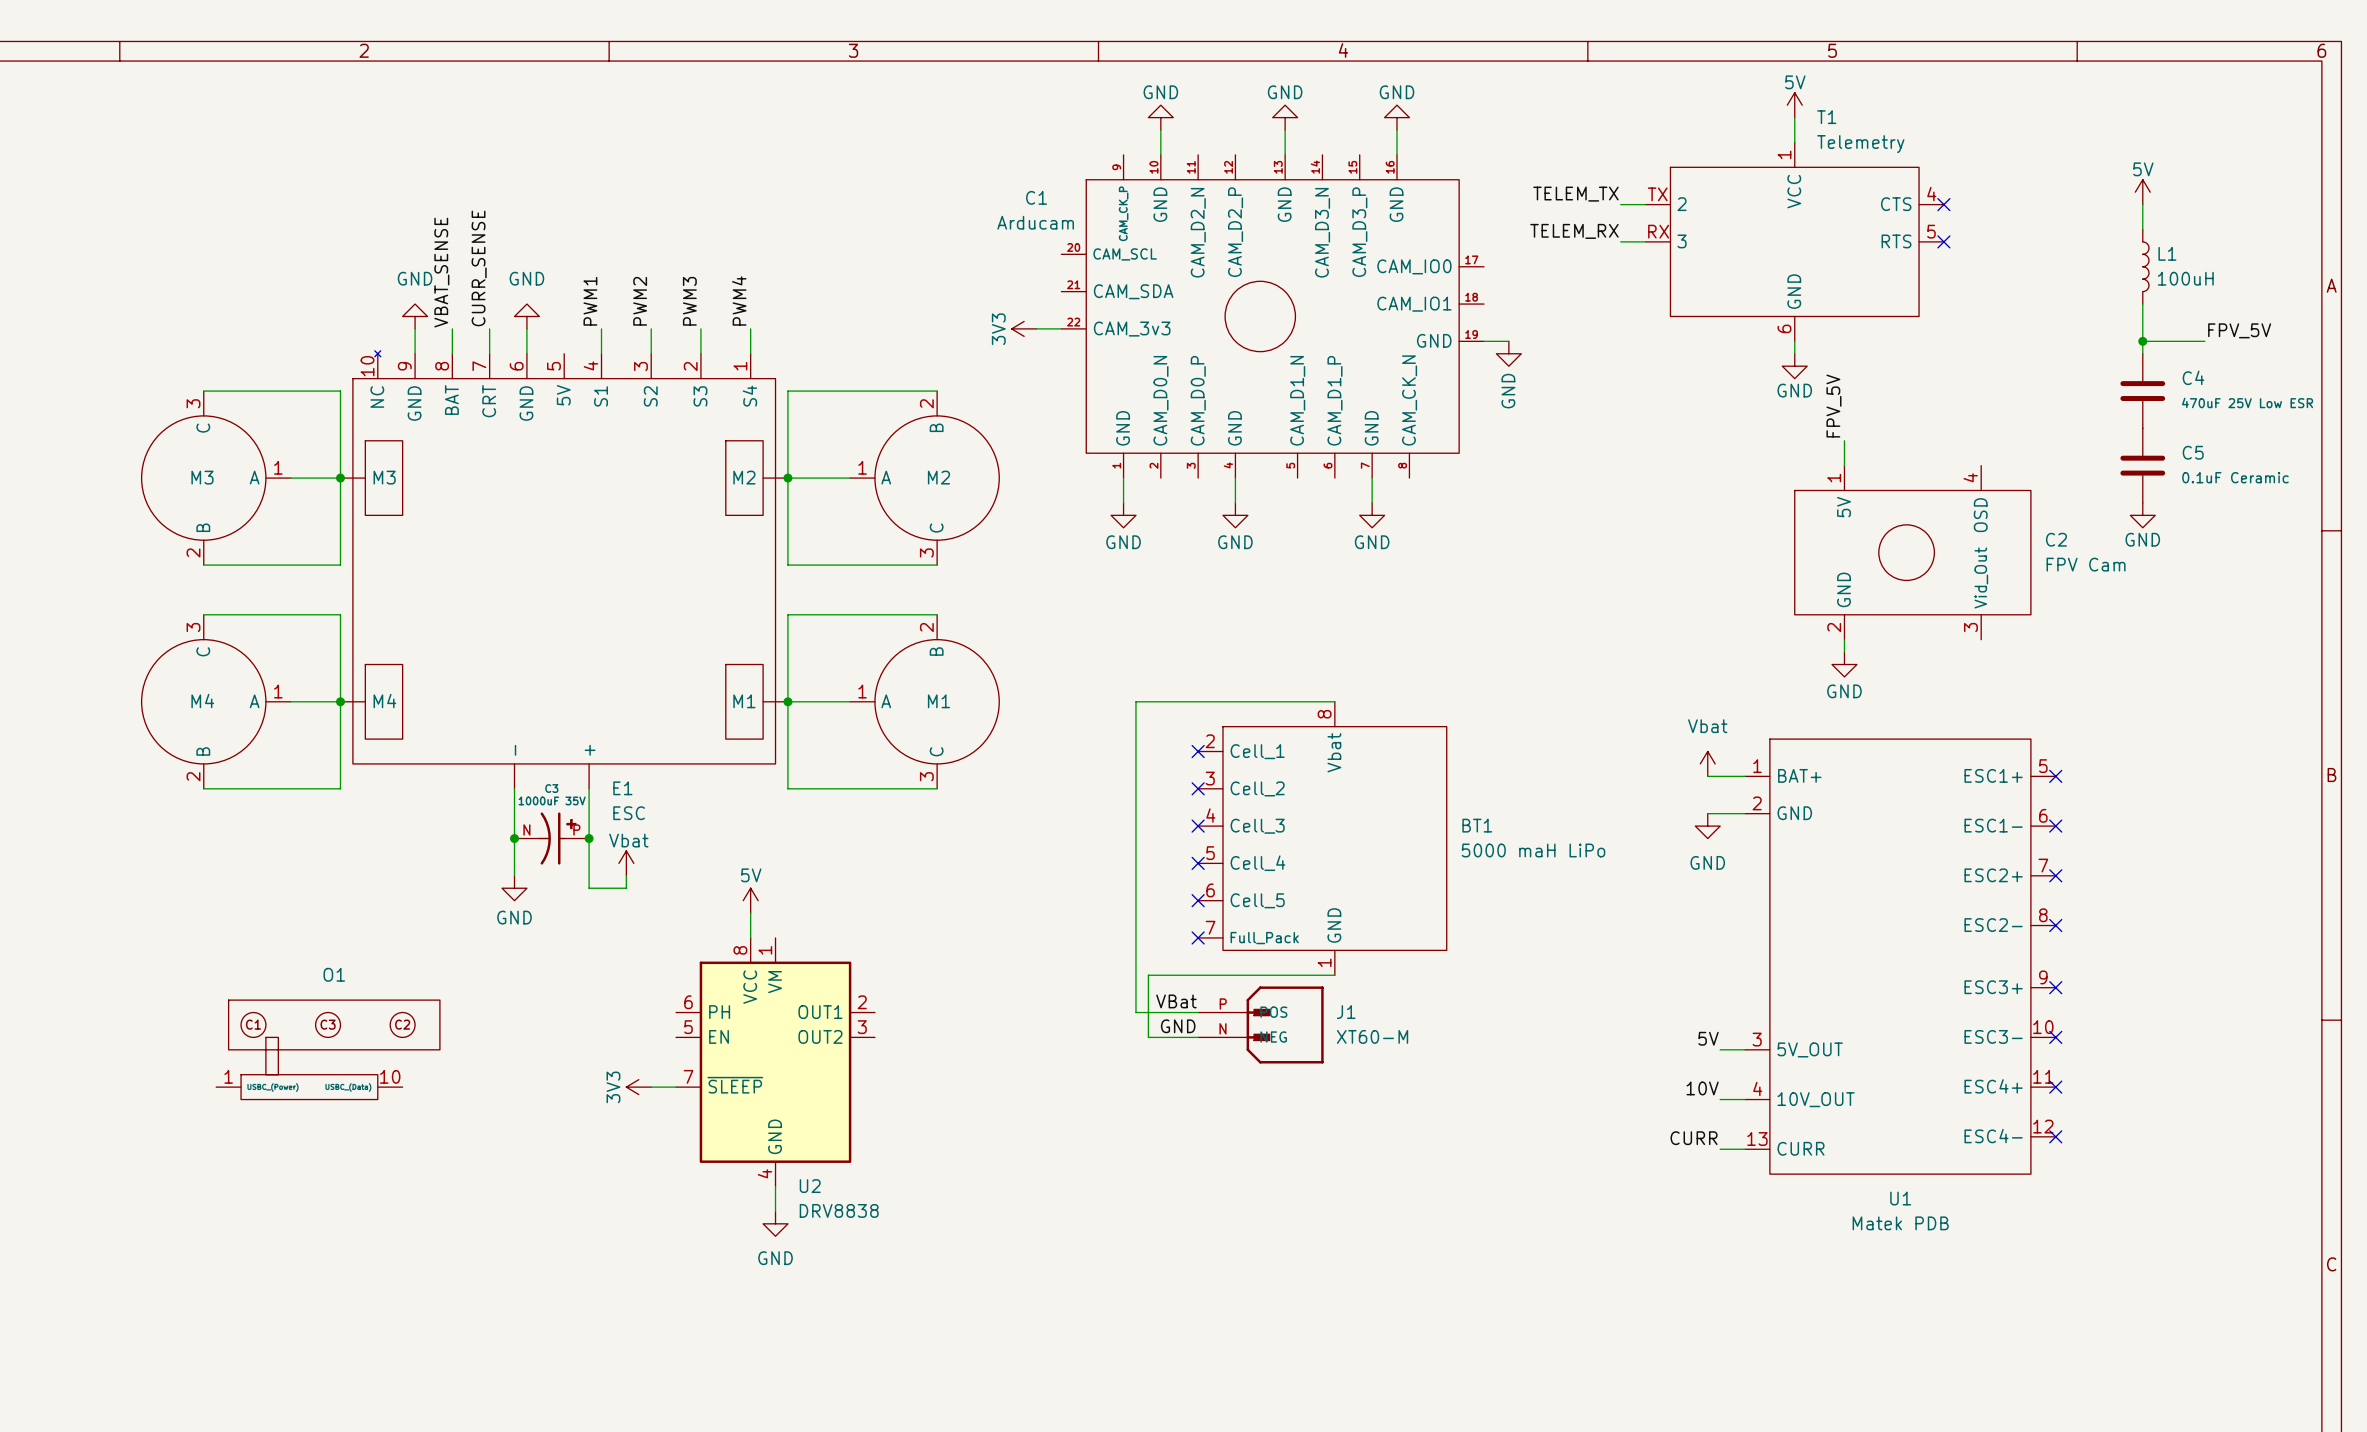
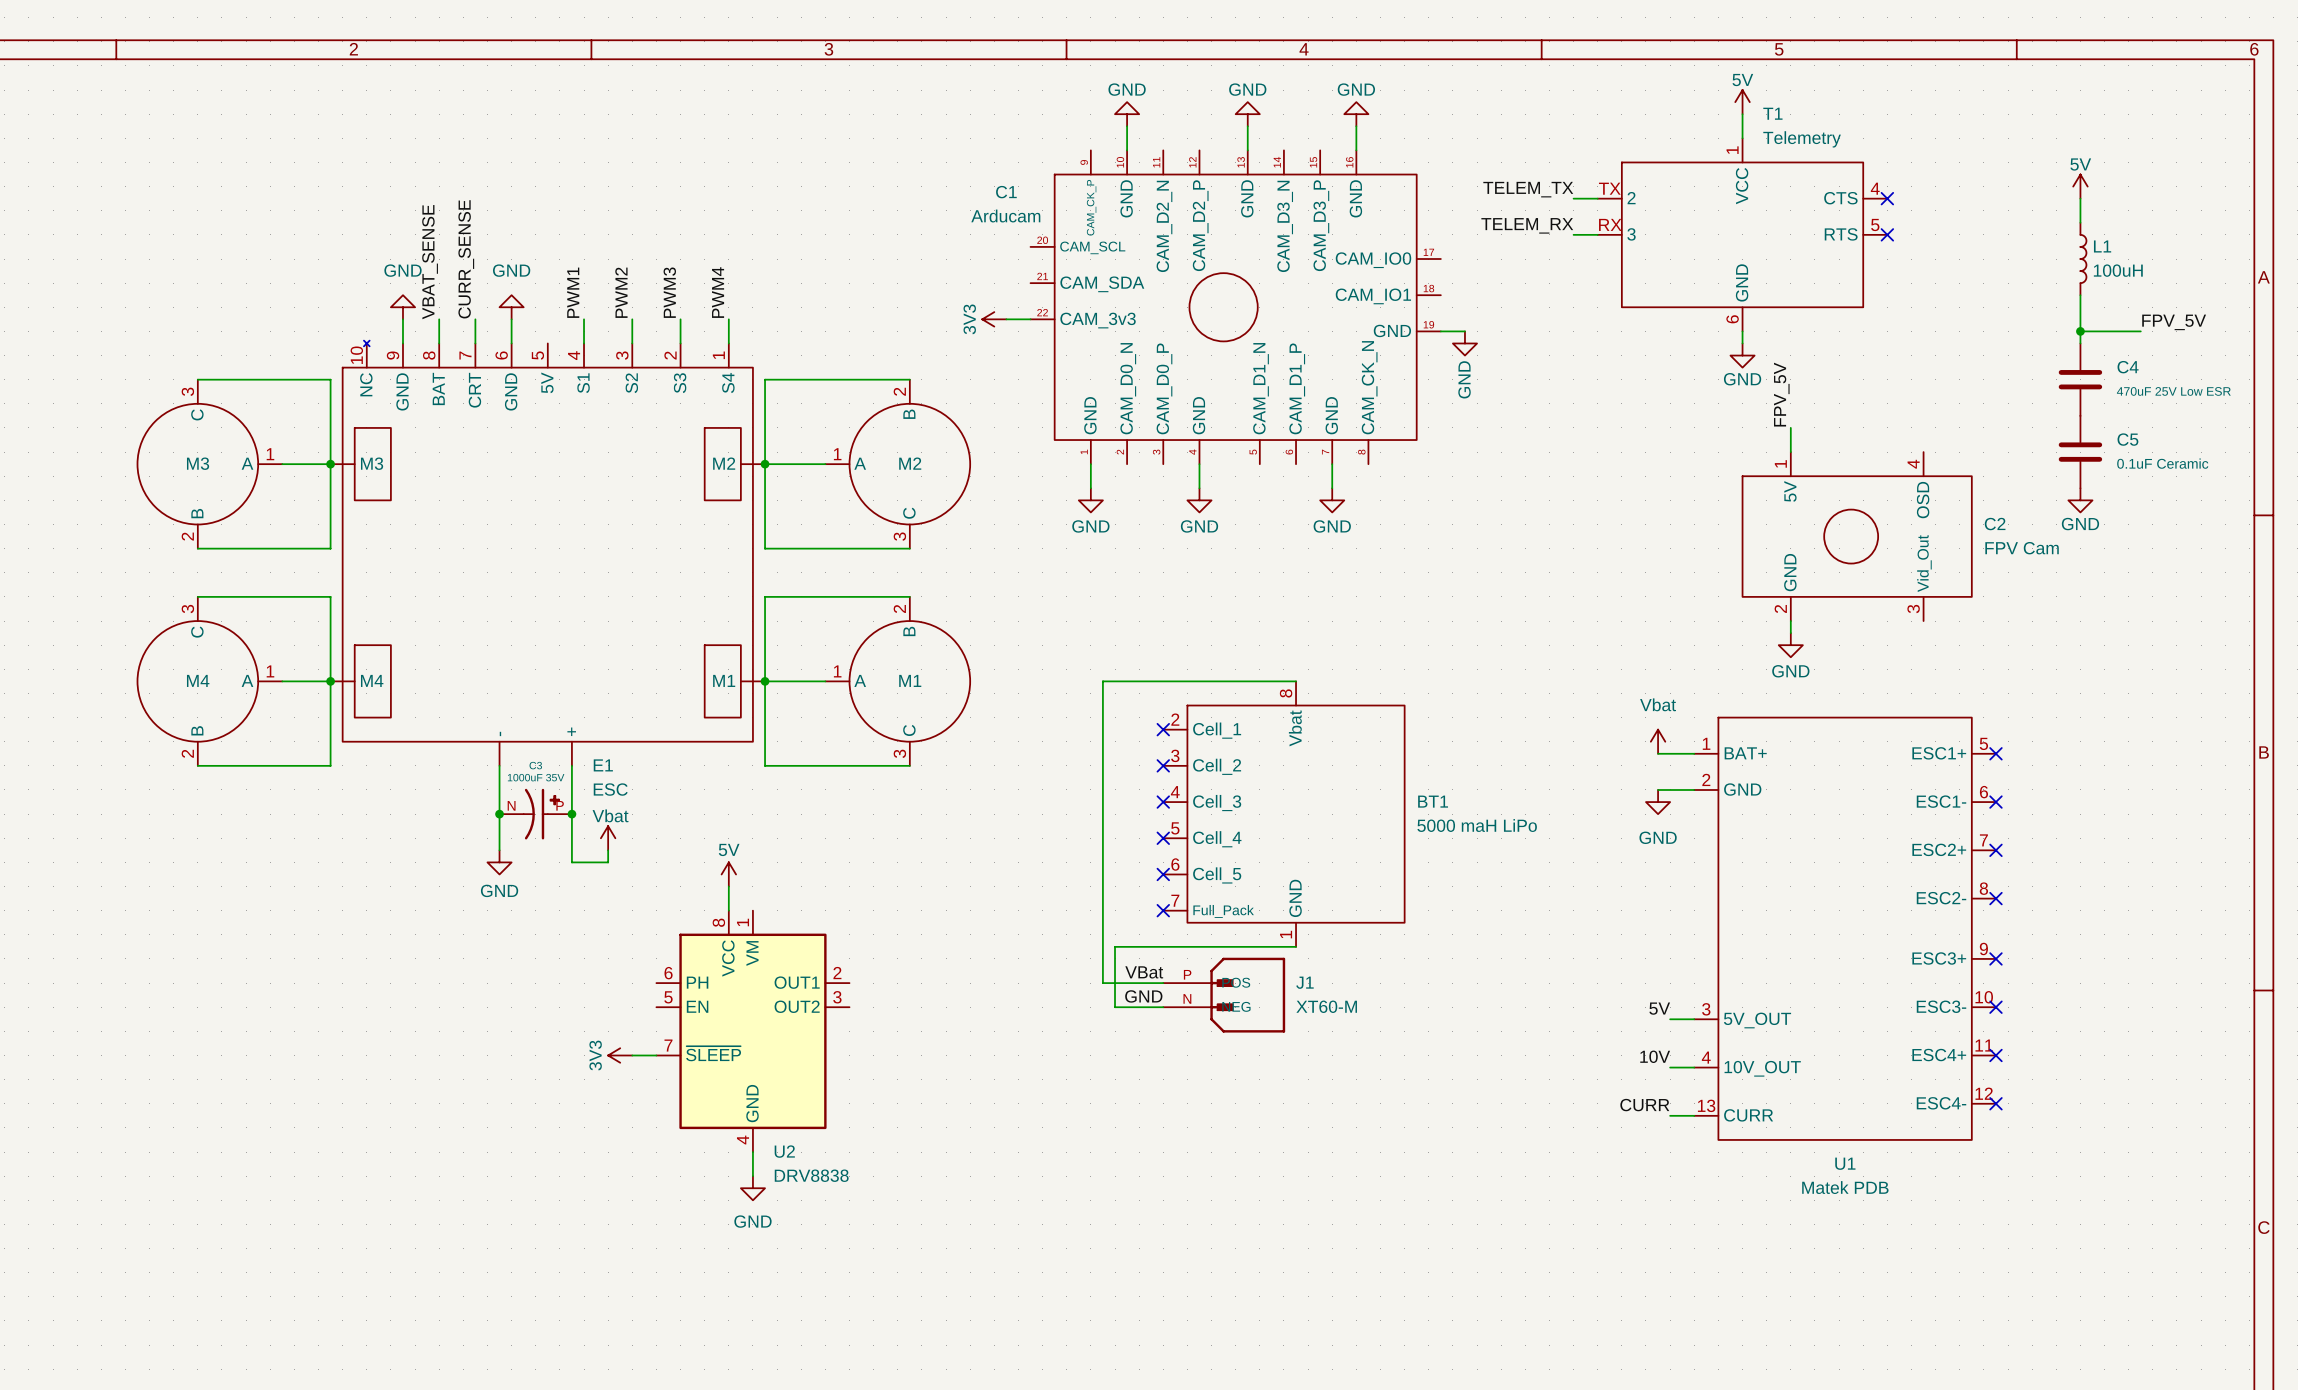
O1: (328, 1049) -> none

